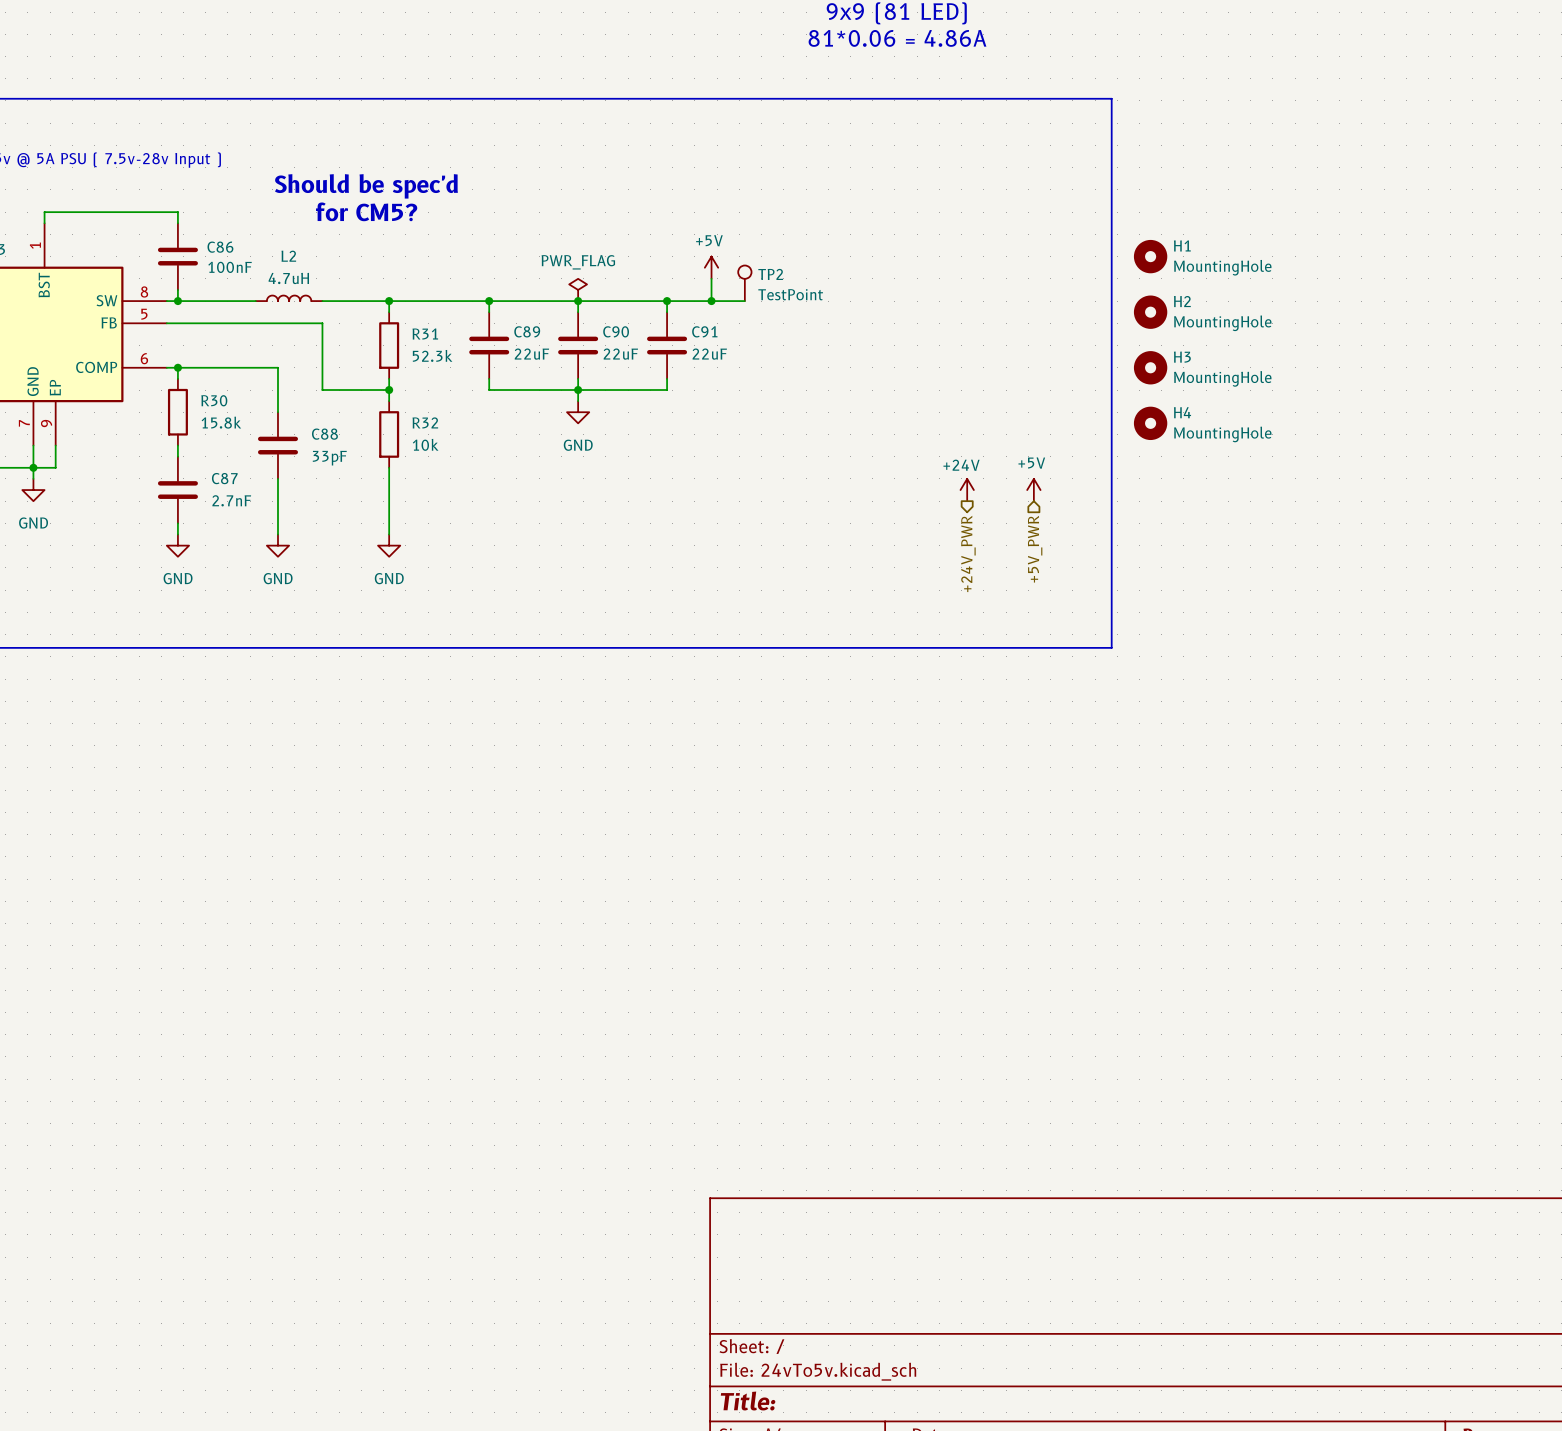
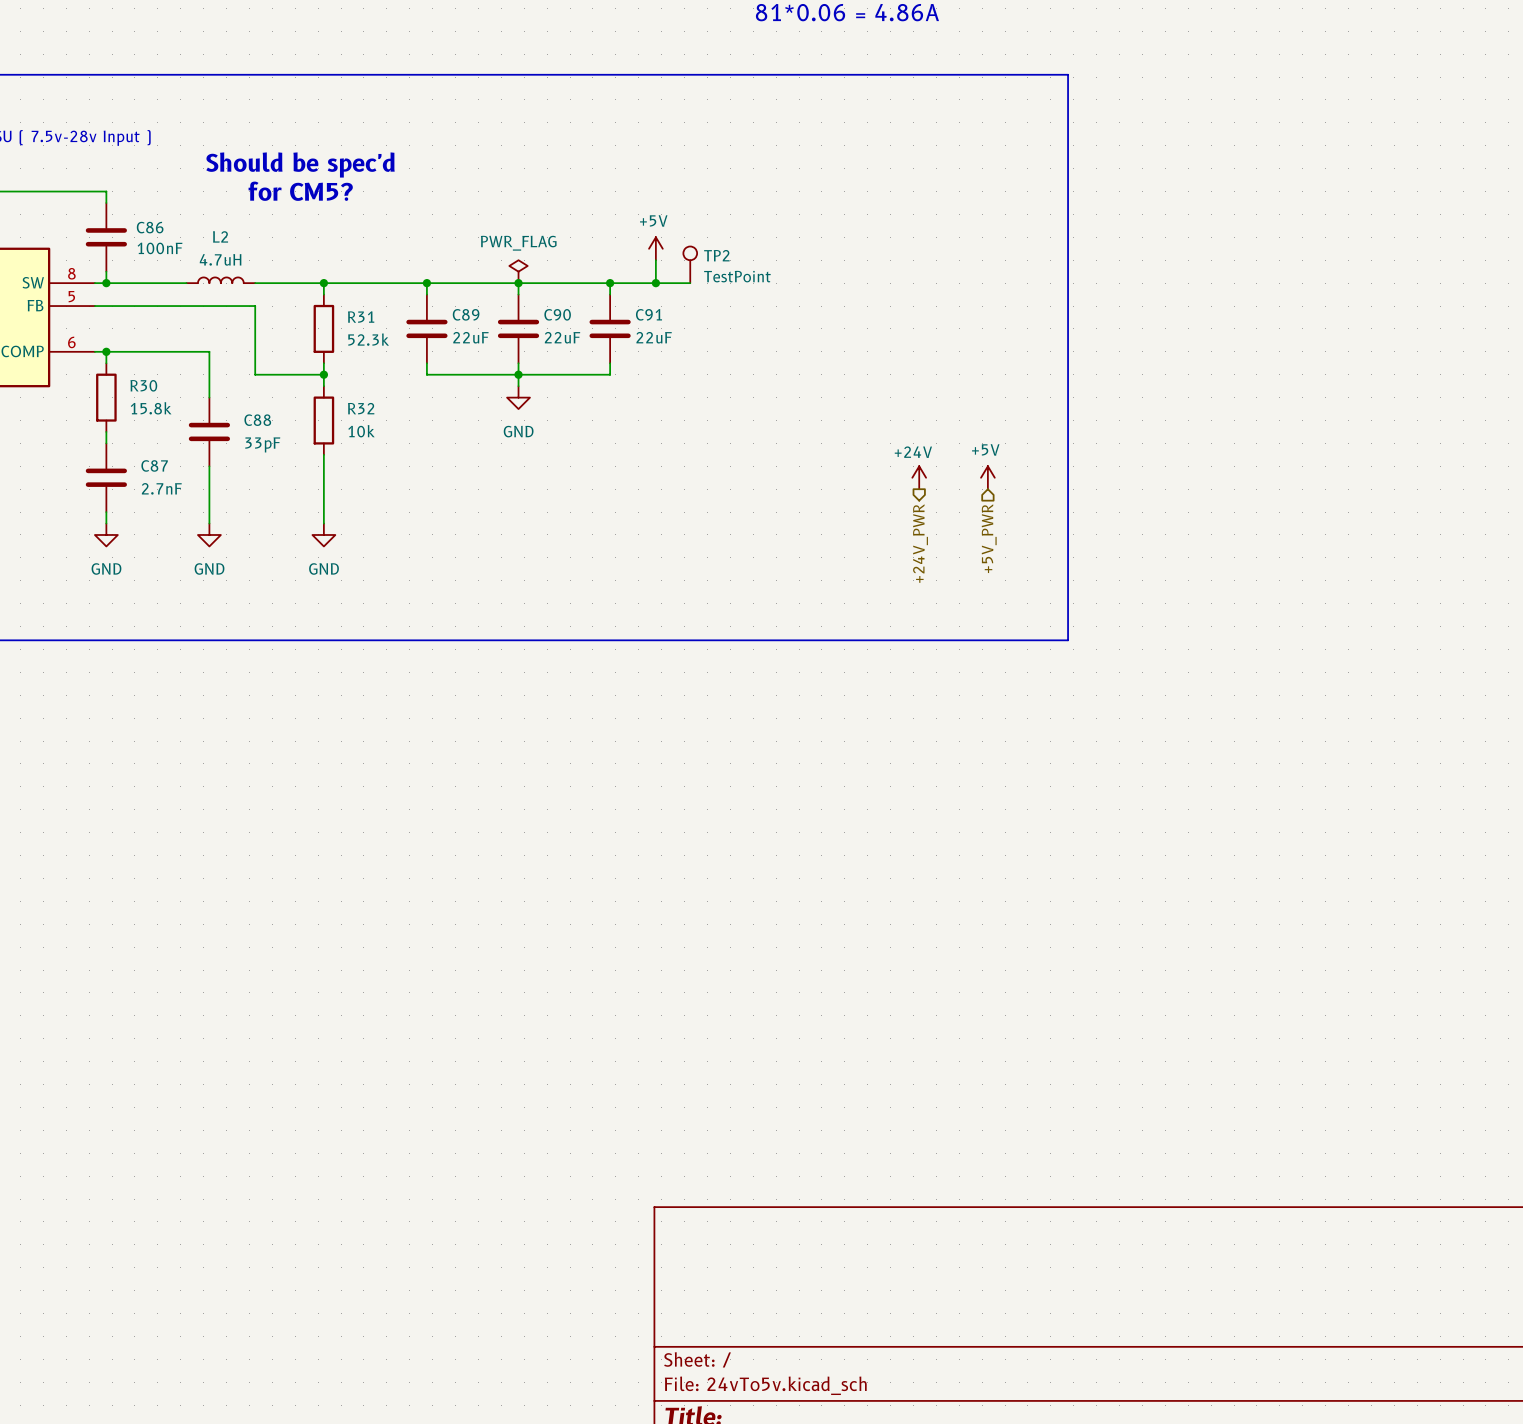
H1: MountingHole (1150, 256) -> none
H2: MountingHole (1150, 312) -> none
H3: MountingHole (1150, 367) -> none
H4: MountingHole (1150, 423) -> none

